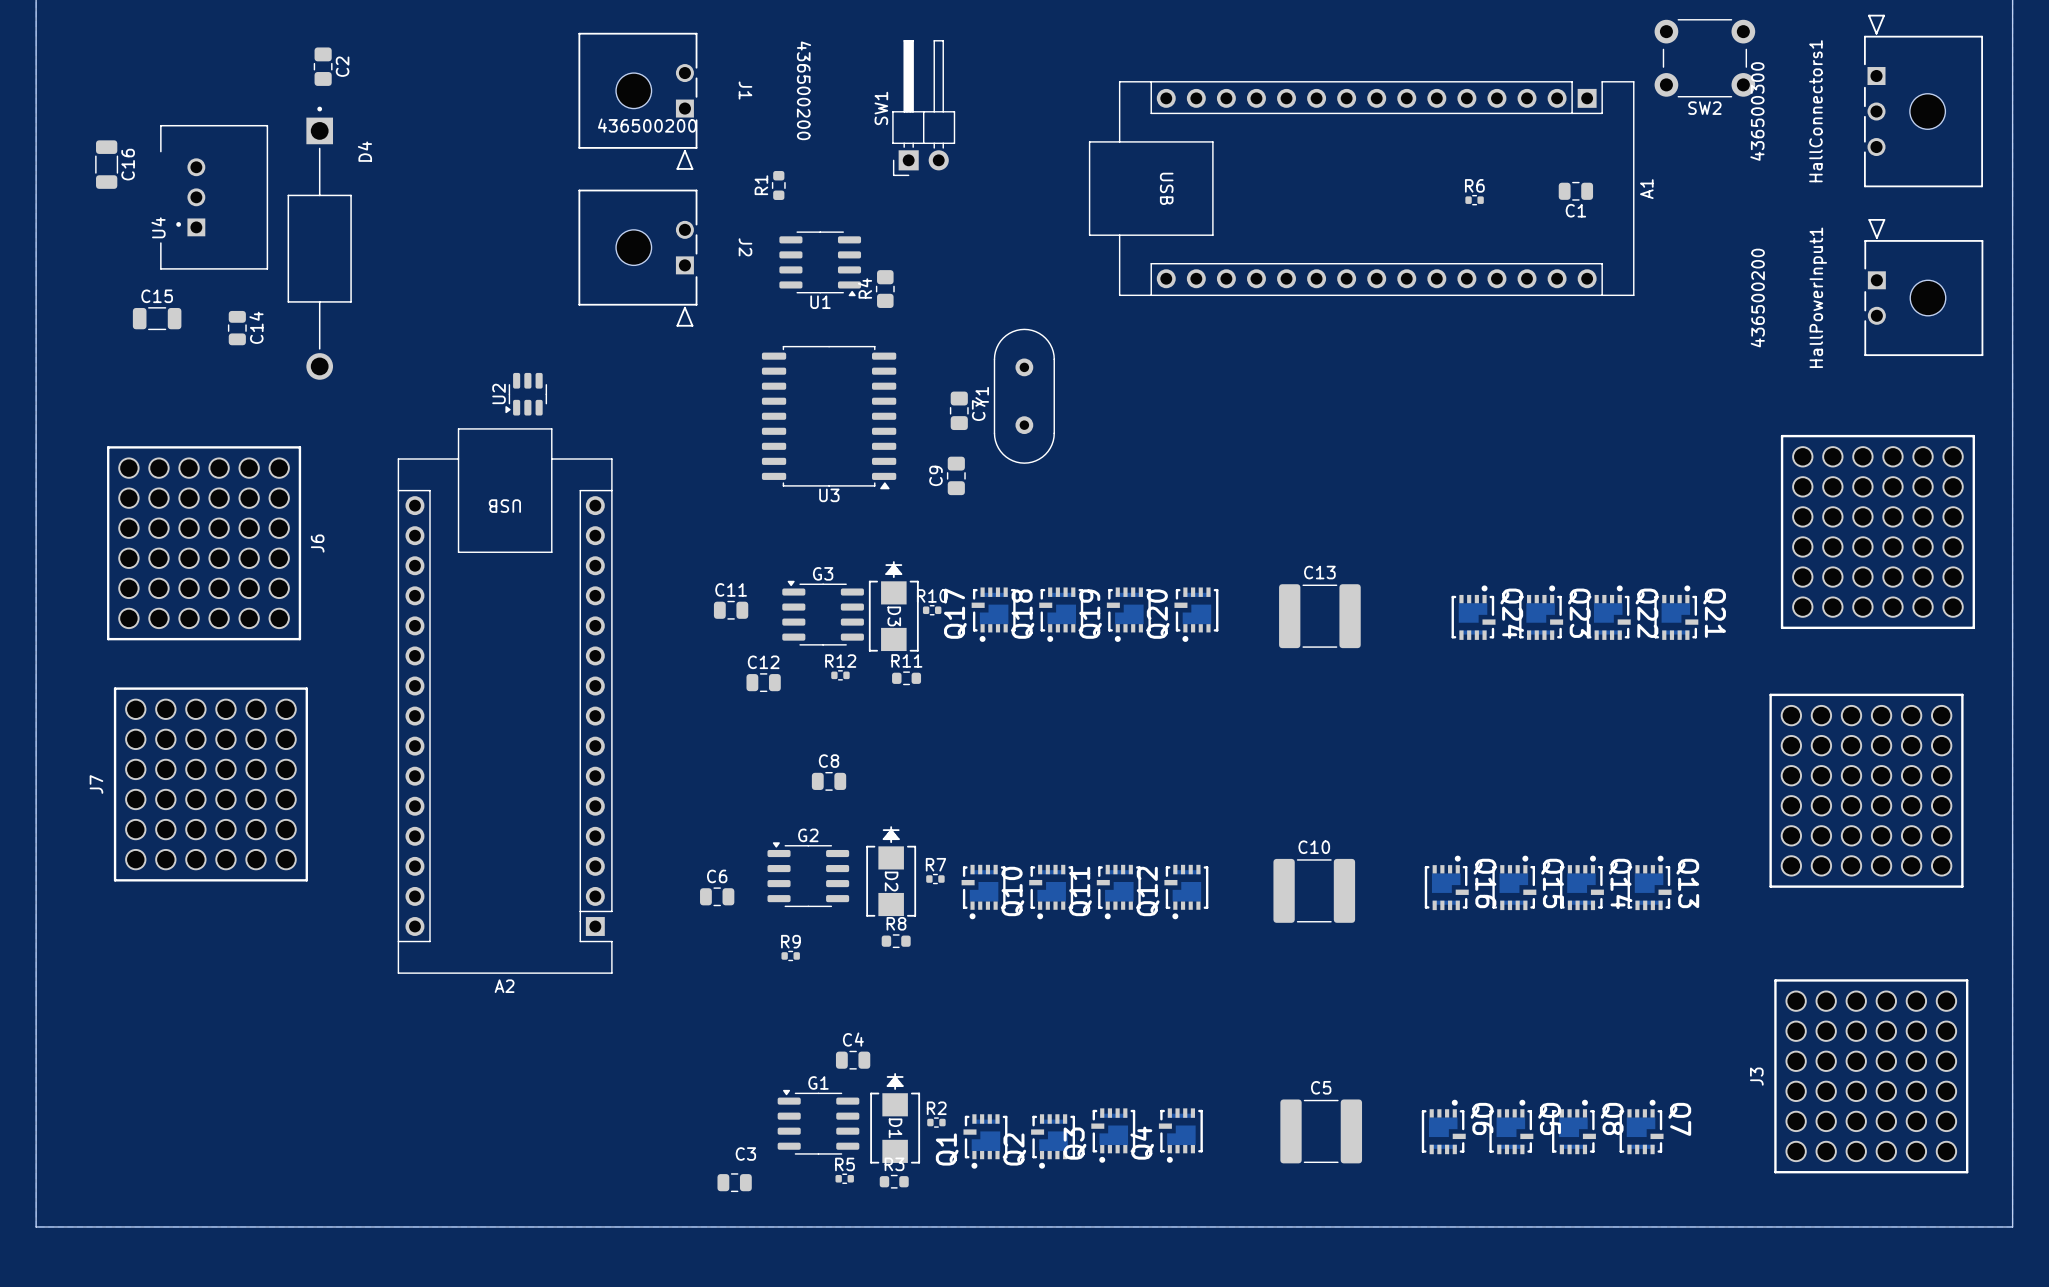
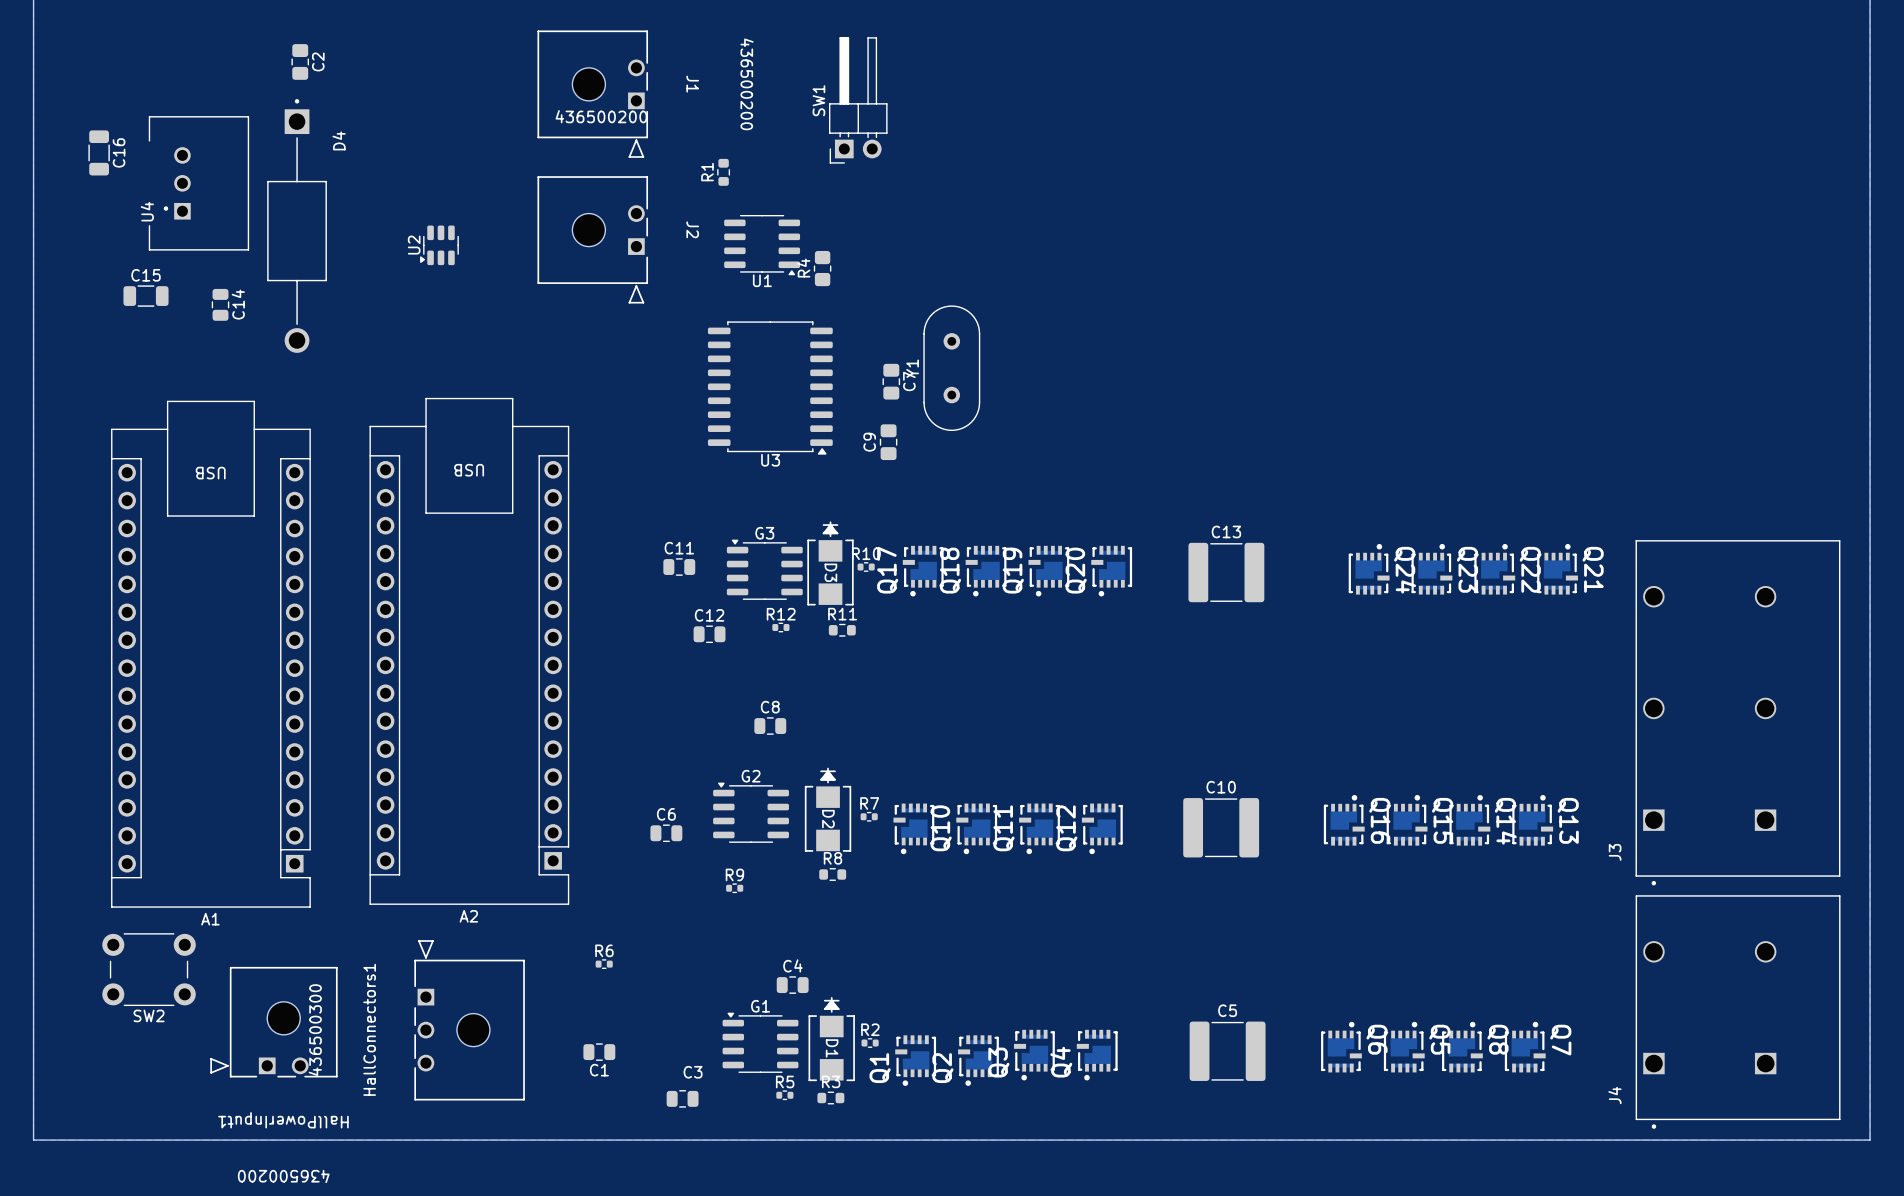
SW2 position: (1704, 58) -> (149, 969)
HallConnectors1 position: (1923, 100) -> (469, 1020)
A1 rotation: 0° (1361, 188) -> 90° clockwise (210, 654)
A1 position: (1361, 188) -> (210, 654)
C1 position: (1575, 191) -> (599, 1052)
R6 position: (1474, 200) -> (604, 964)
HallPowerInput1 rotation: 0° (1923, 287) -> 90° counterclockwise (273, 1022)
HallPowerInput1 position: (1923, 287) -> (273, 1022)
U2 position: (526, 394) -> (439, 245)
part: (1877, 531) -> none
J6: (204, 543) -> none
J7: (210, 784) -> none
part: (1866, 790) -> none
J3 footprint: [1774, 979, 1969, 1174] -> [1635, 540, 1841, 886]
J3 name position: J3 (1756, 1076) -> J3 (1615, 852)
J4: none -> (1738, 1012)

